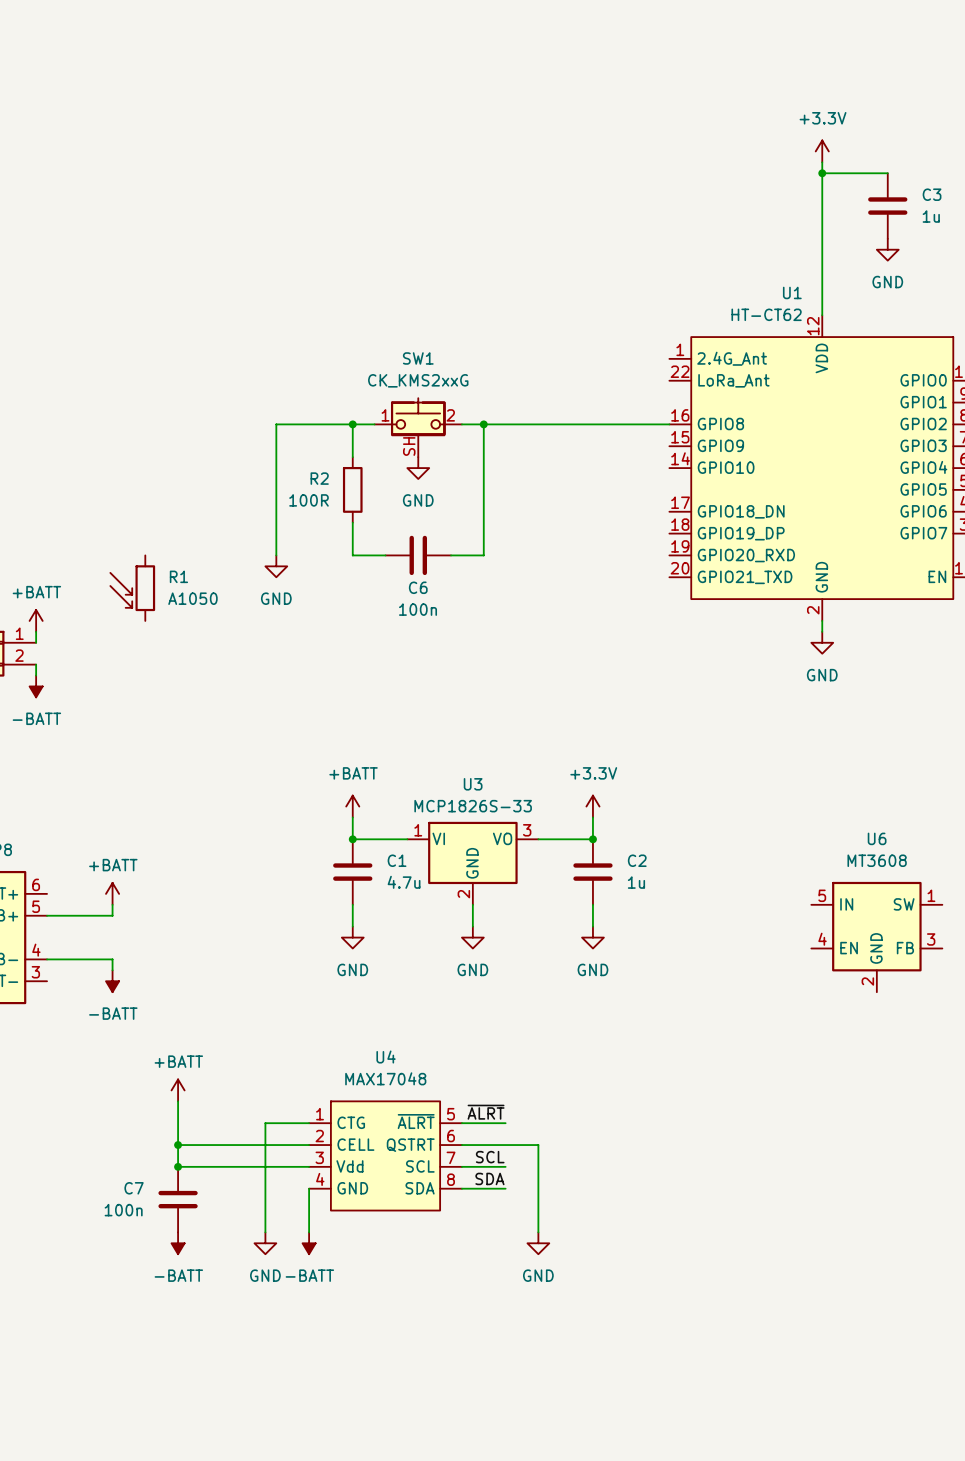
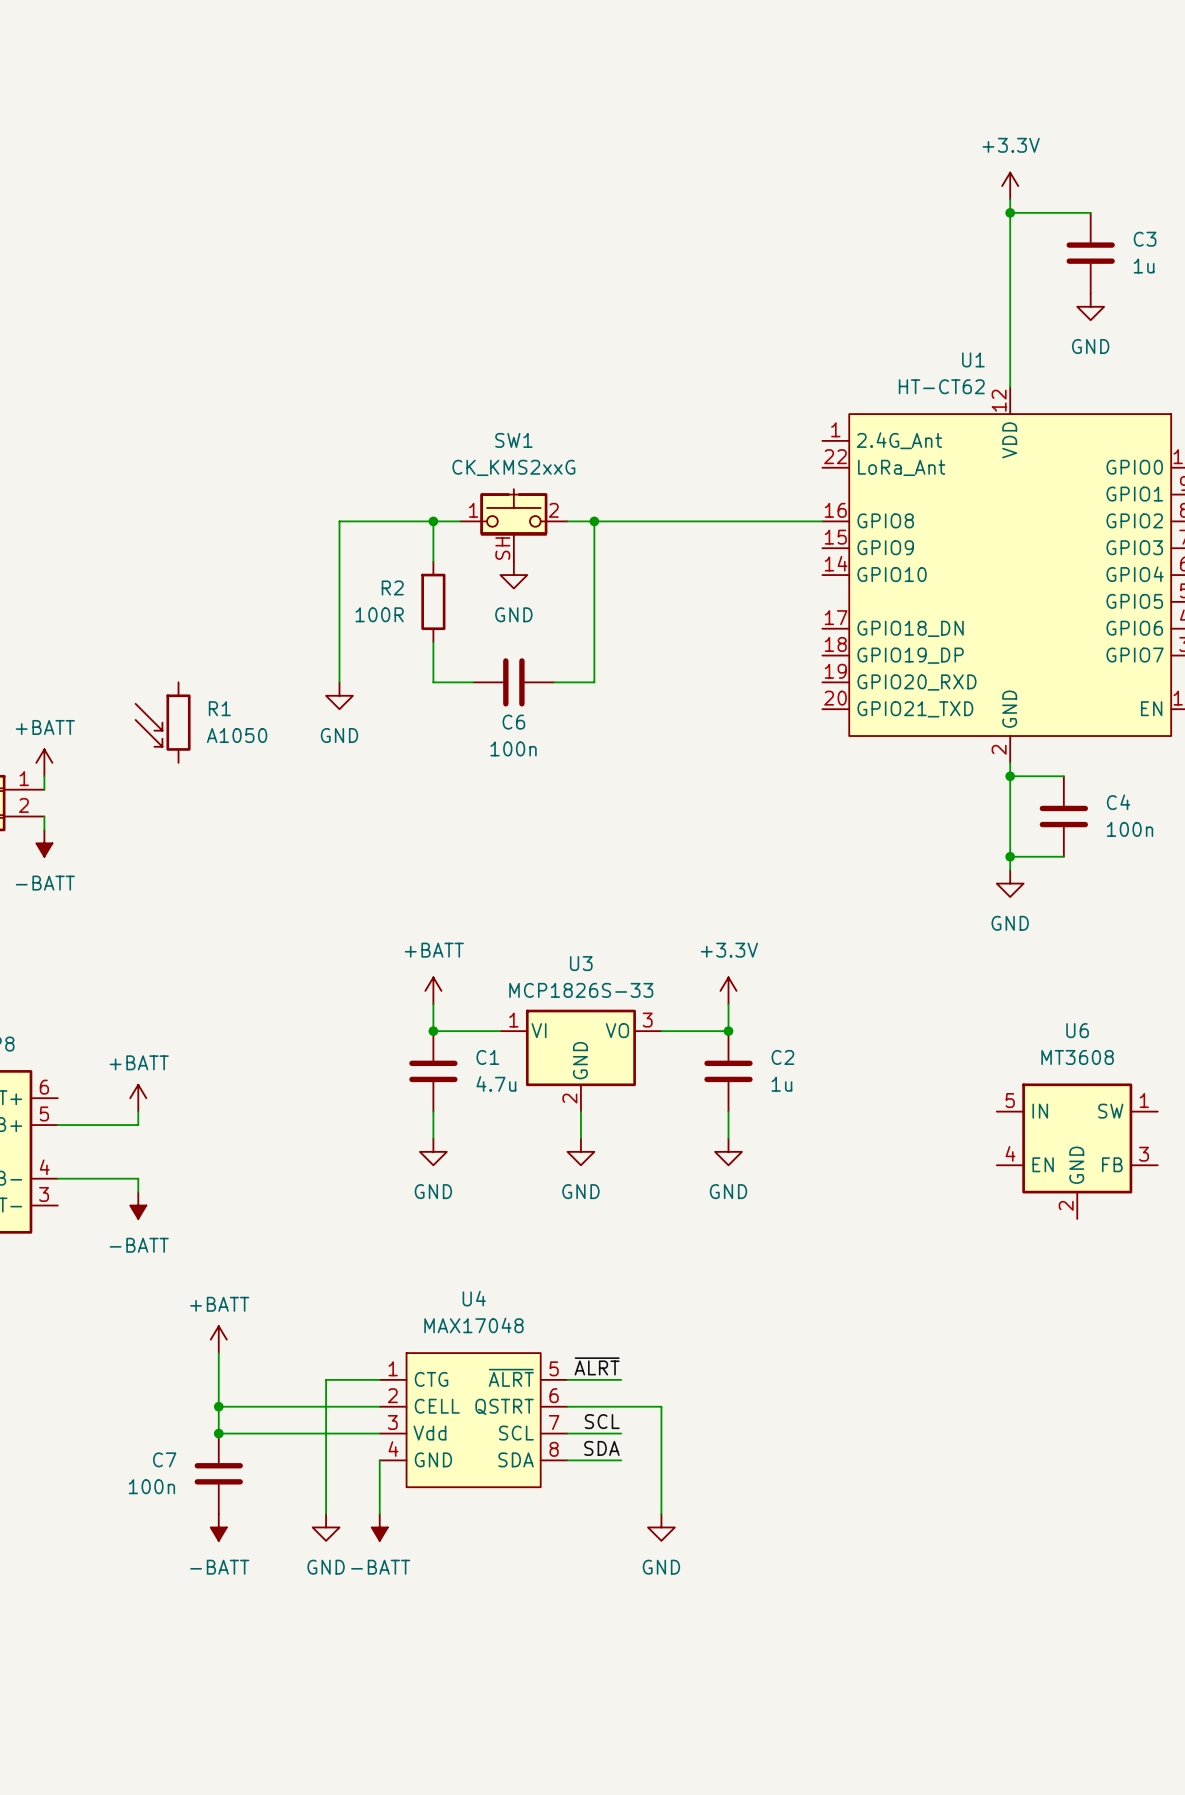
junction: none -> (1010, 776)
wire: none -> (1063, 776) (1010, 776) (1010, 870)
power symbol position: GND (822, 642) -> GND (1010, 883)
C4: none -> (1063, 816)
wire: none -> (1010, 856) (1063, 856)
junction: none -> (1010, 856)

